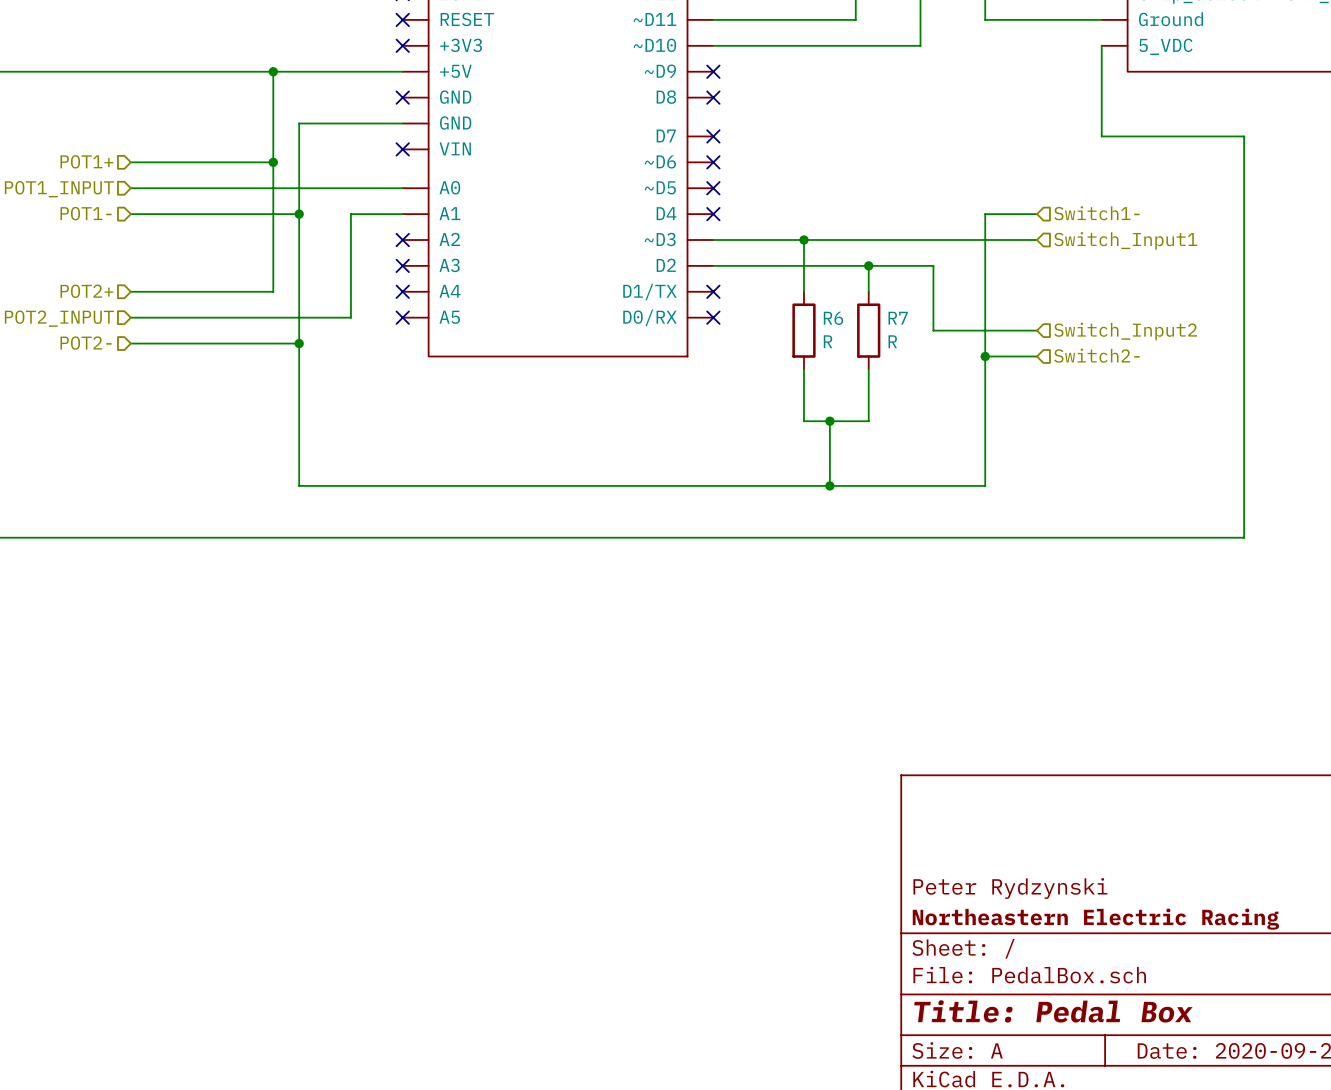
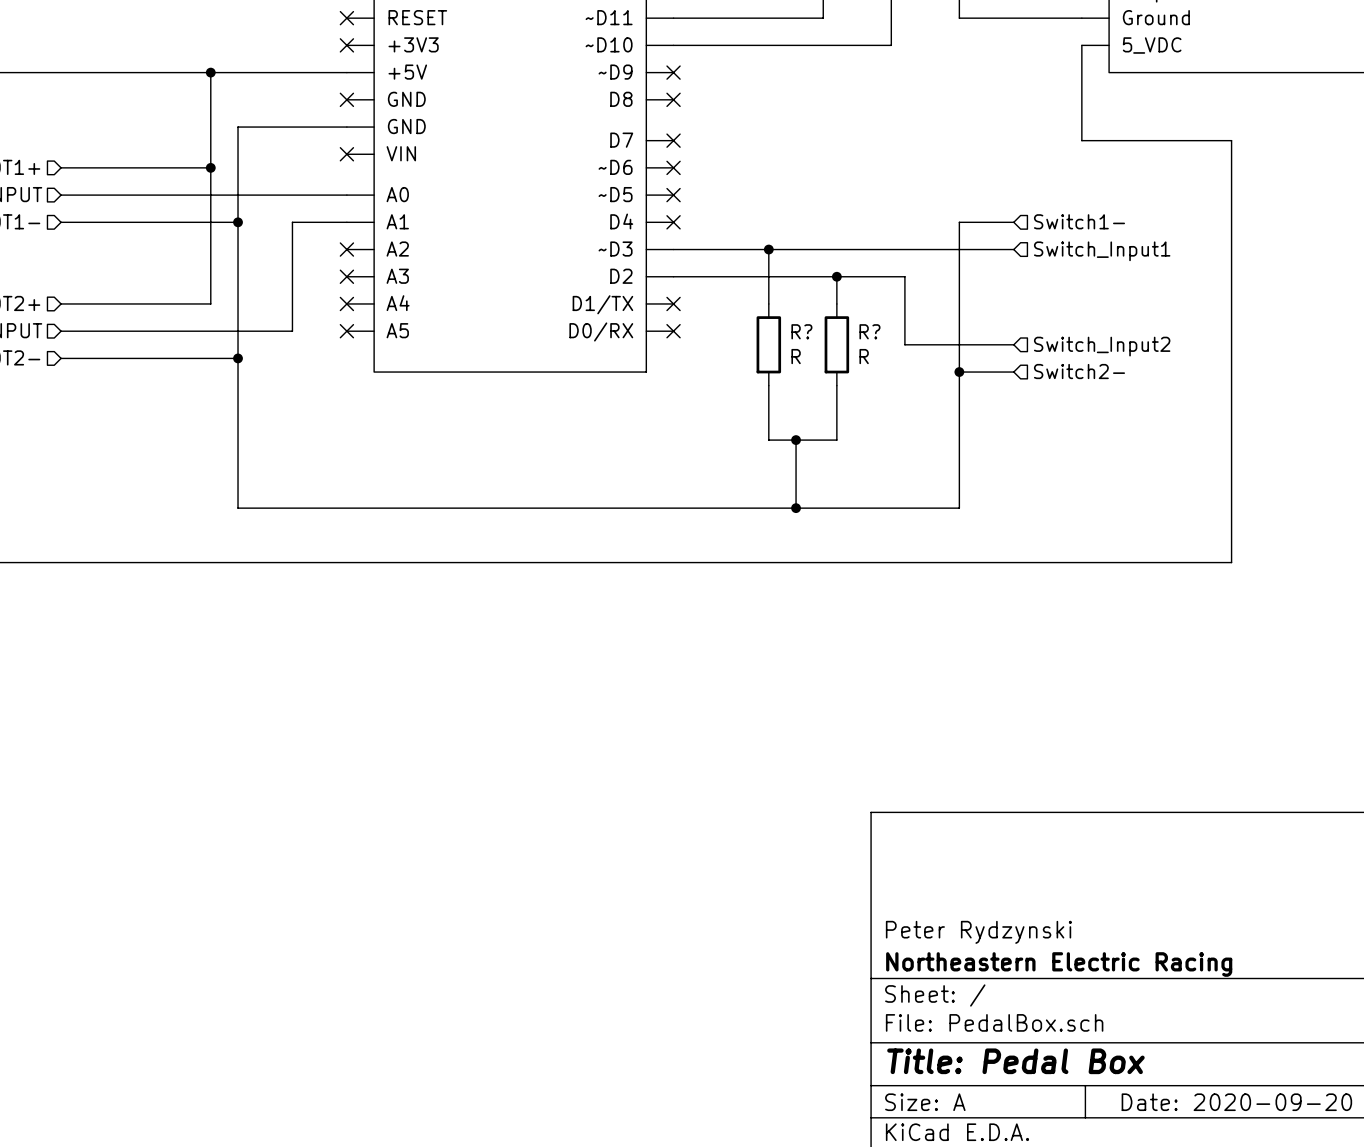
R6 name: R6 (833, 318) -> R? (801, 331)
R7 name: R7 (898, 318) -> R? (869, 331)

